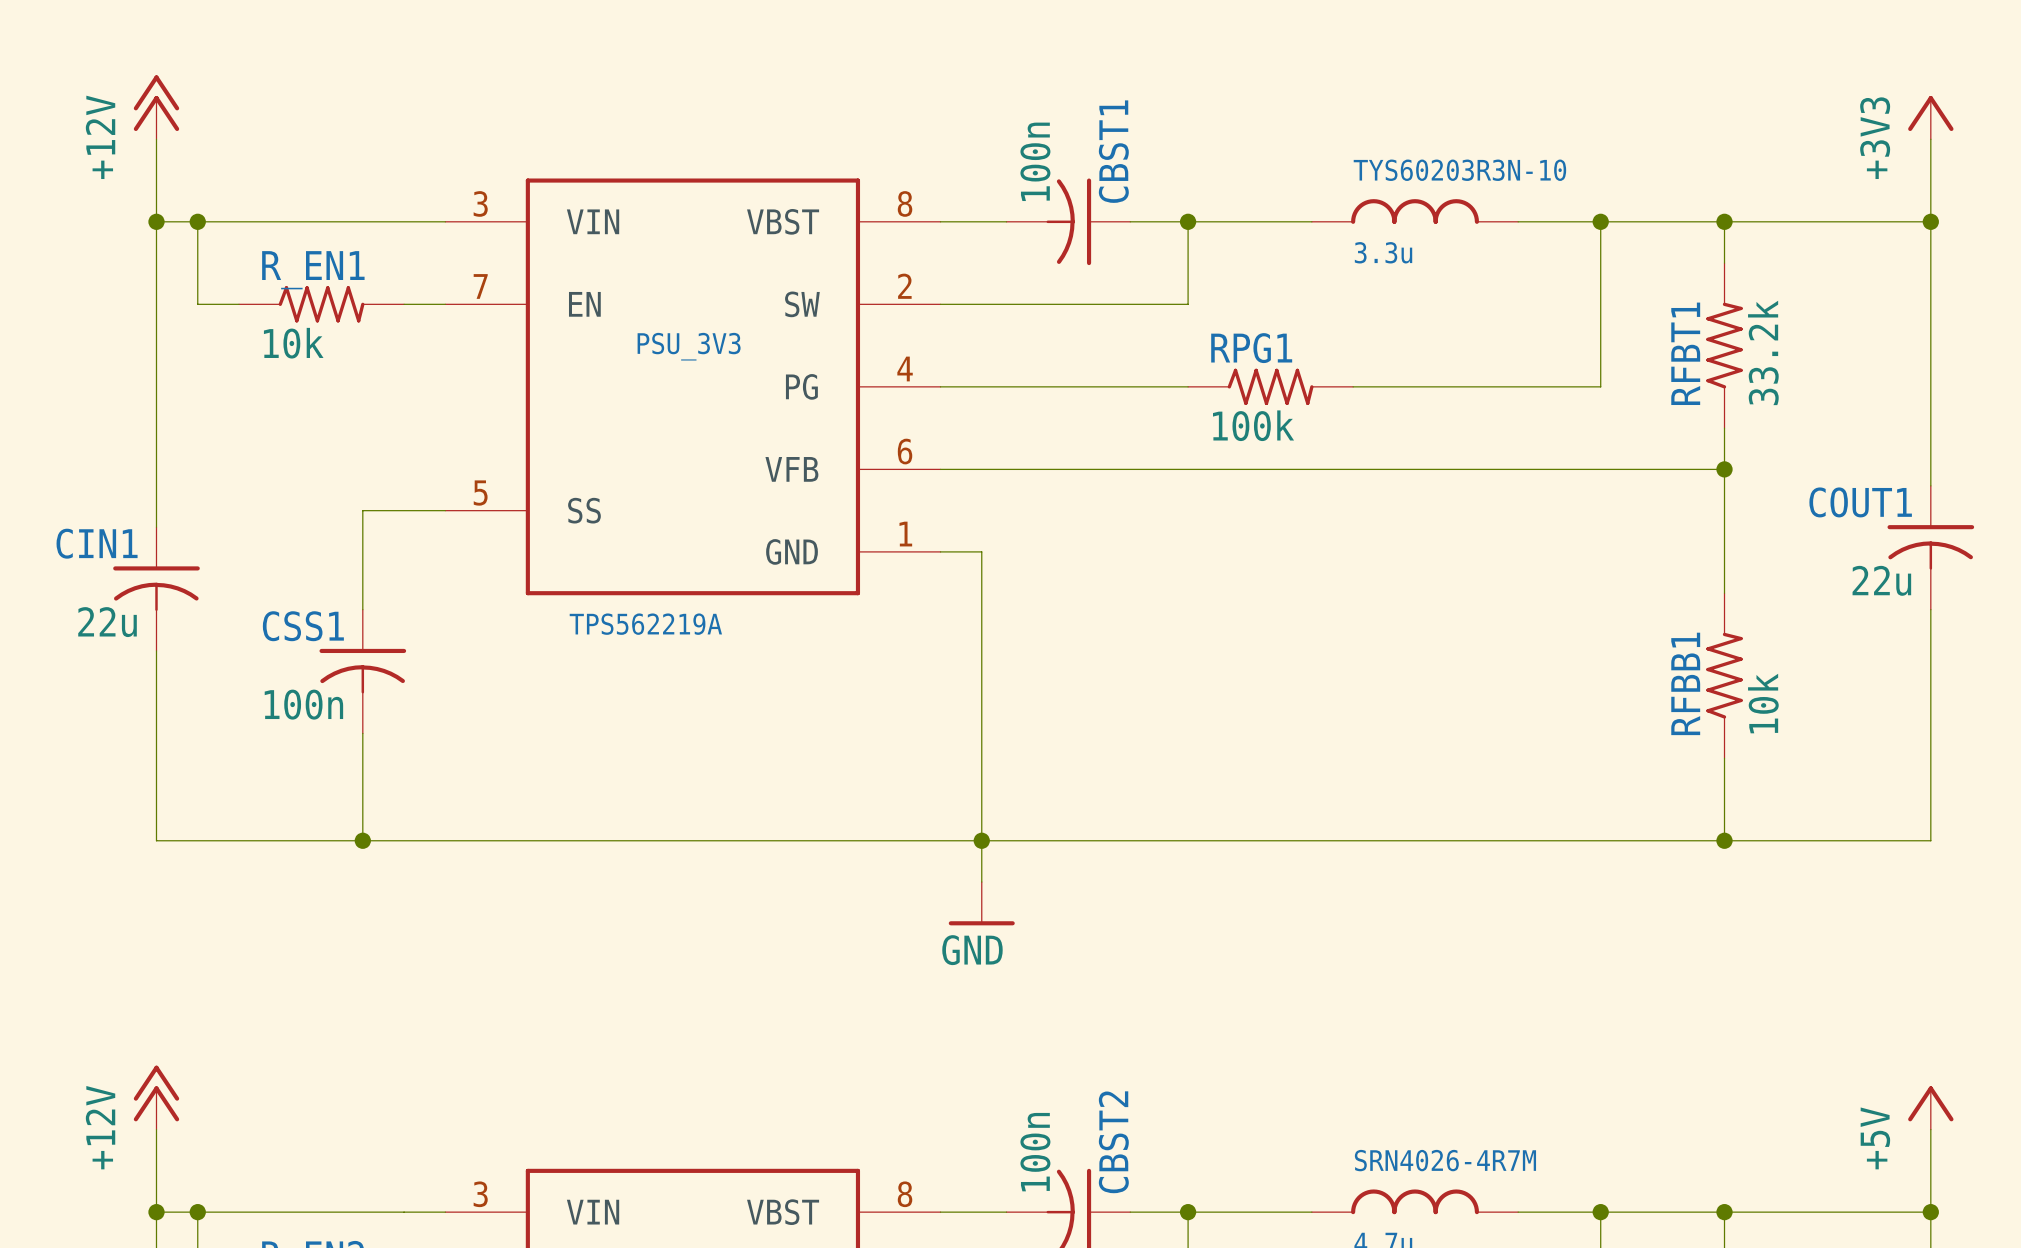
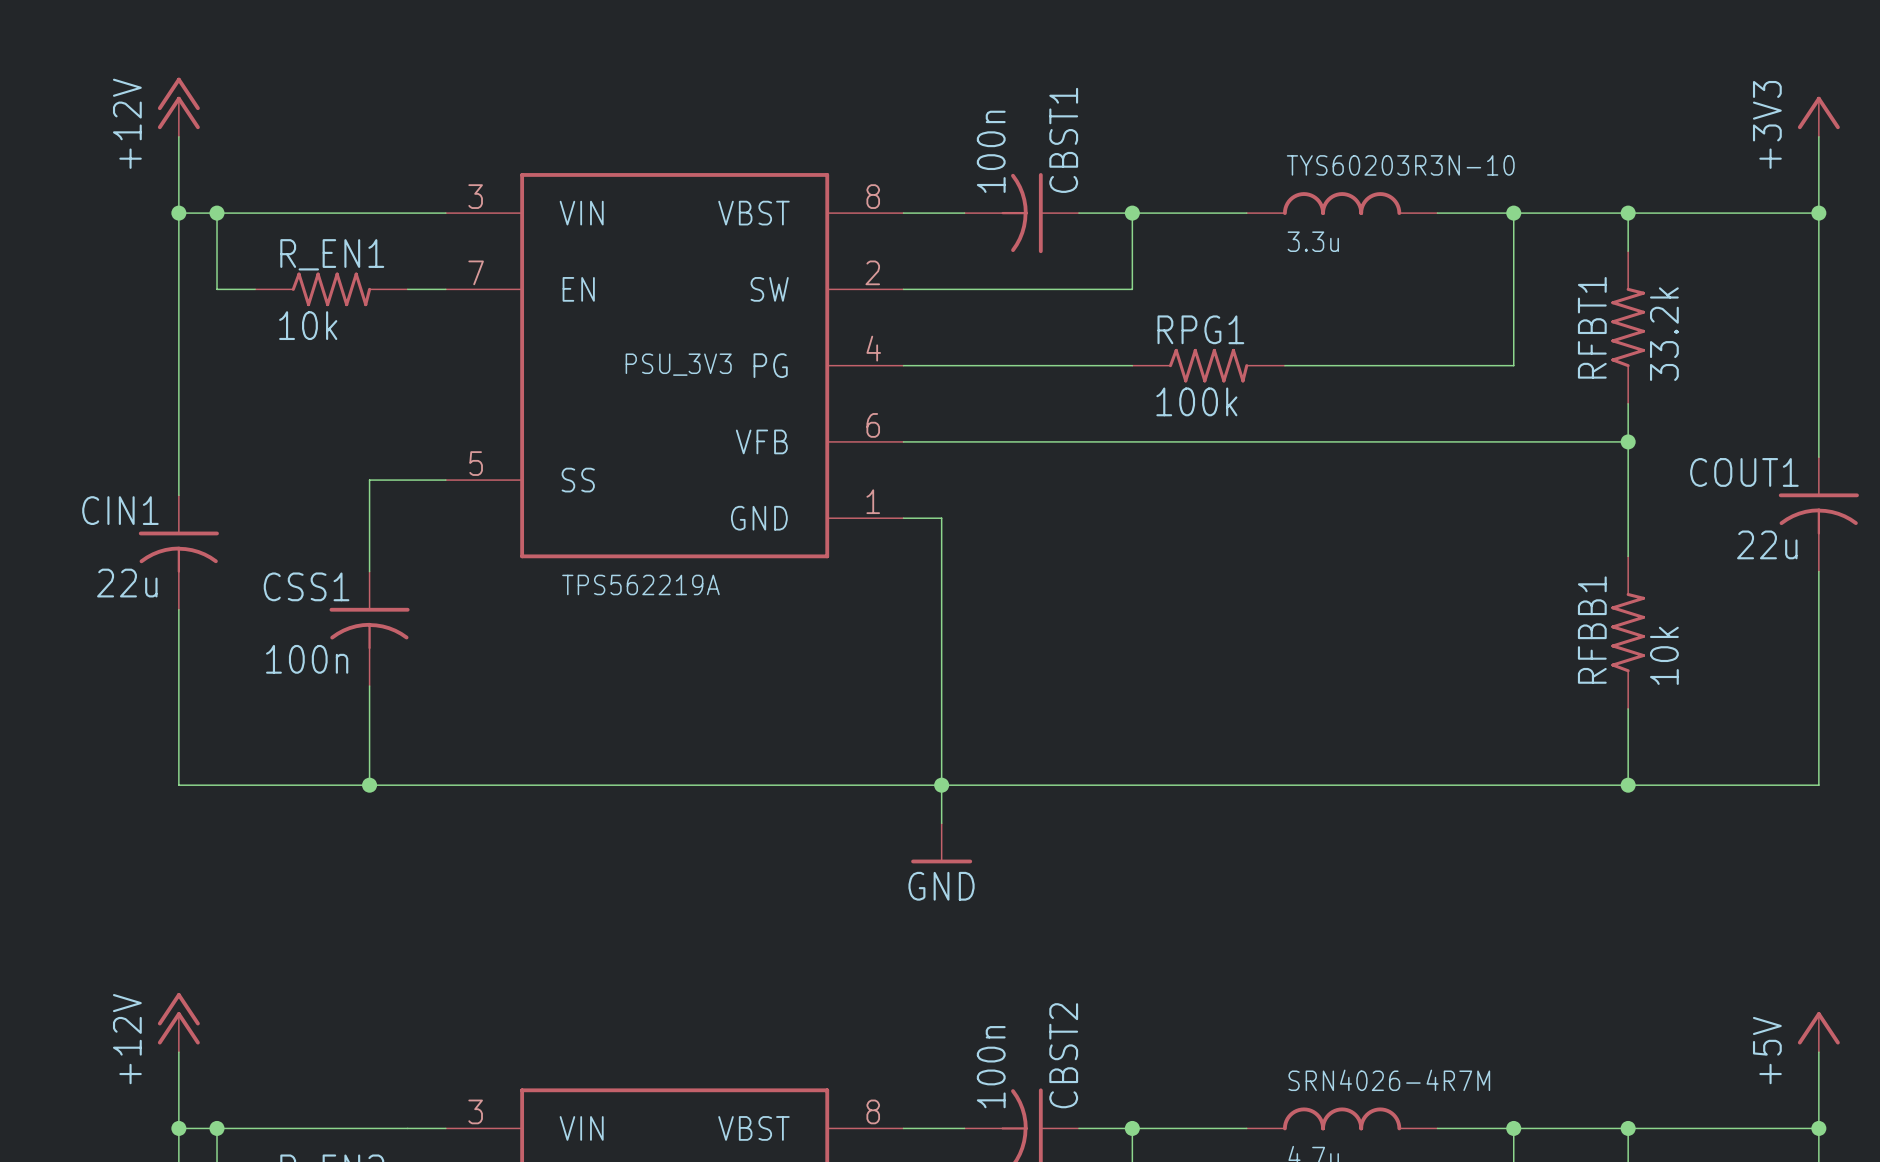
PSU_3V3 name position: PSU_3V3 (689, 346) -> PSU_3V3 (678, 364)

